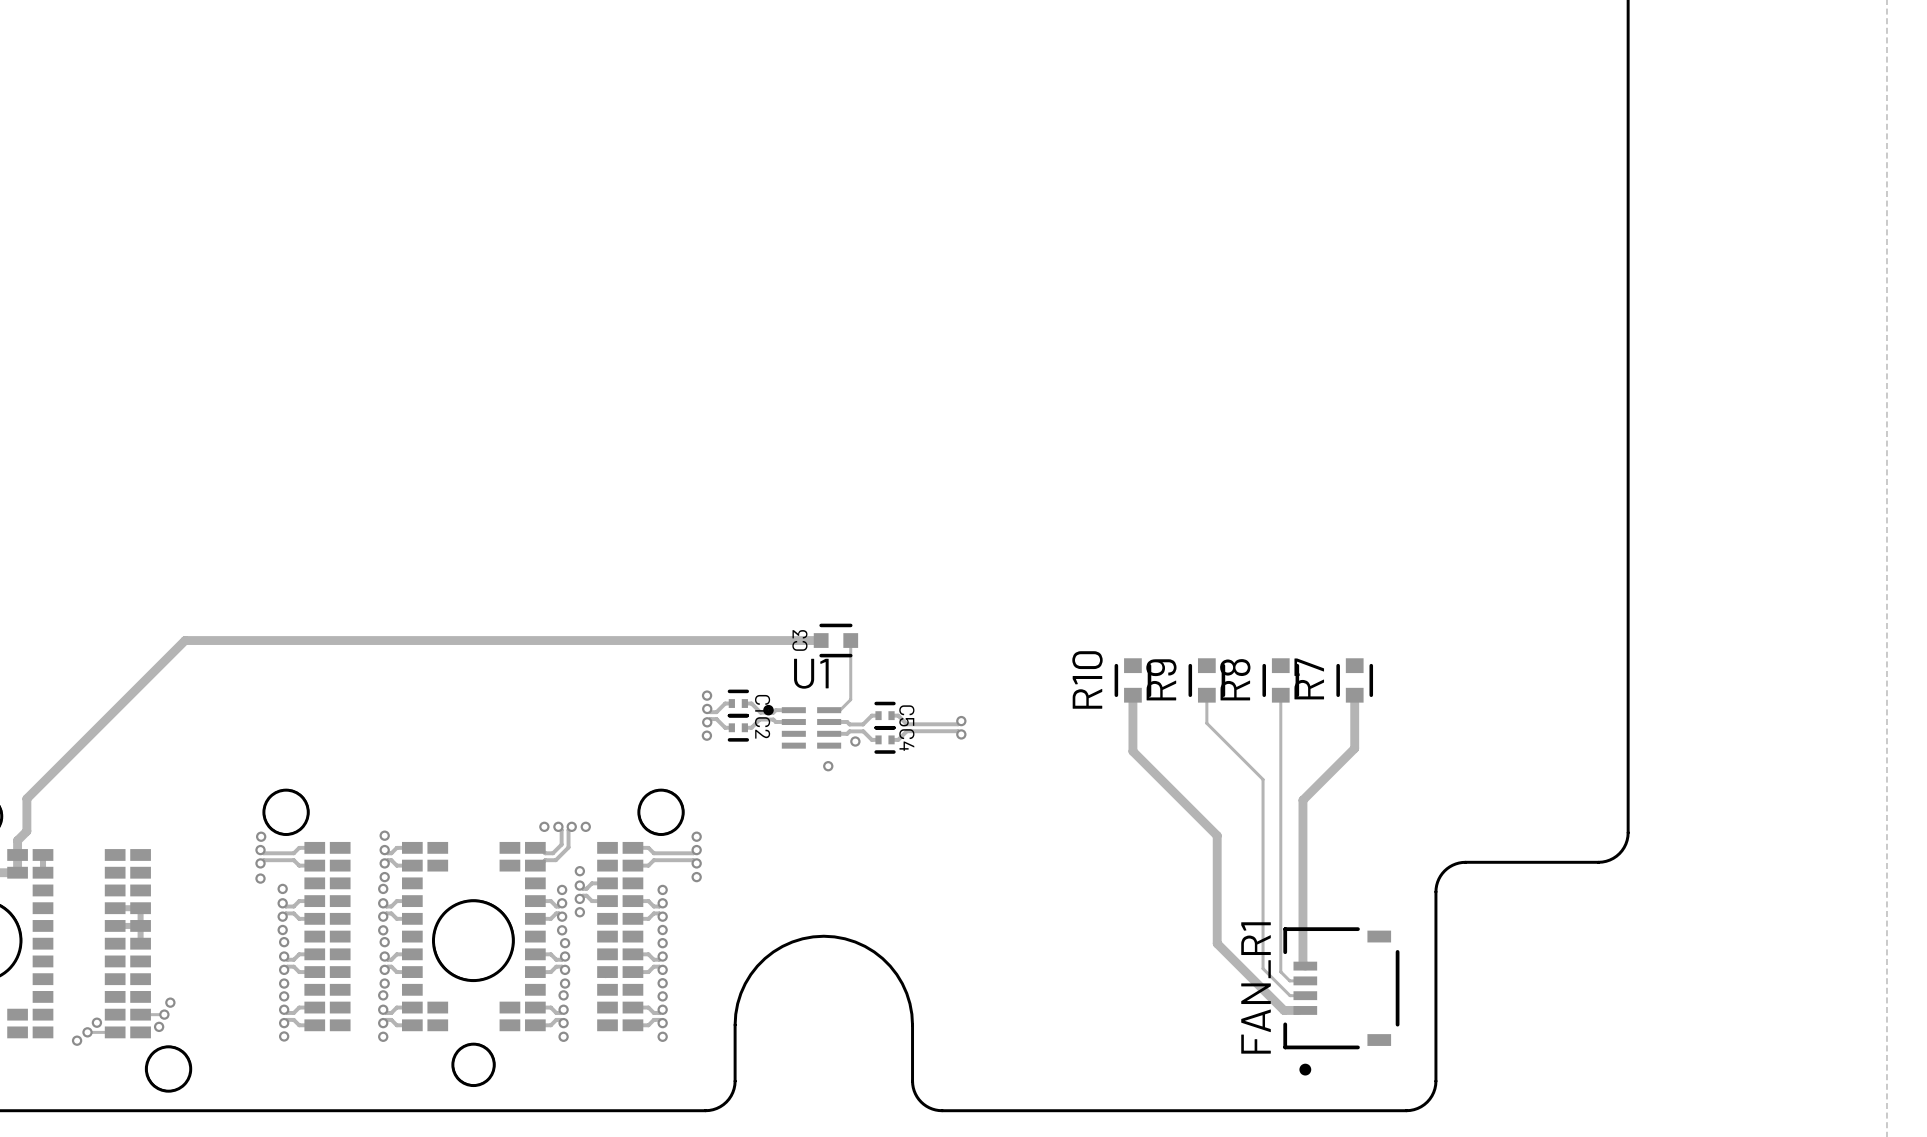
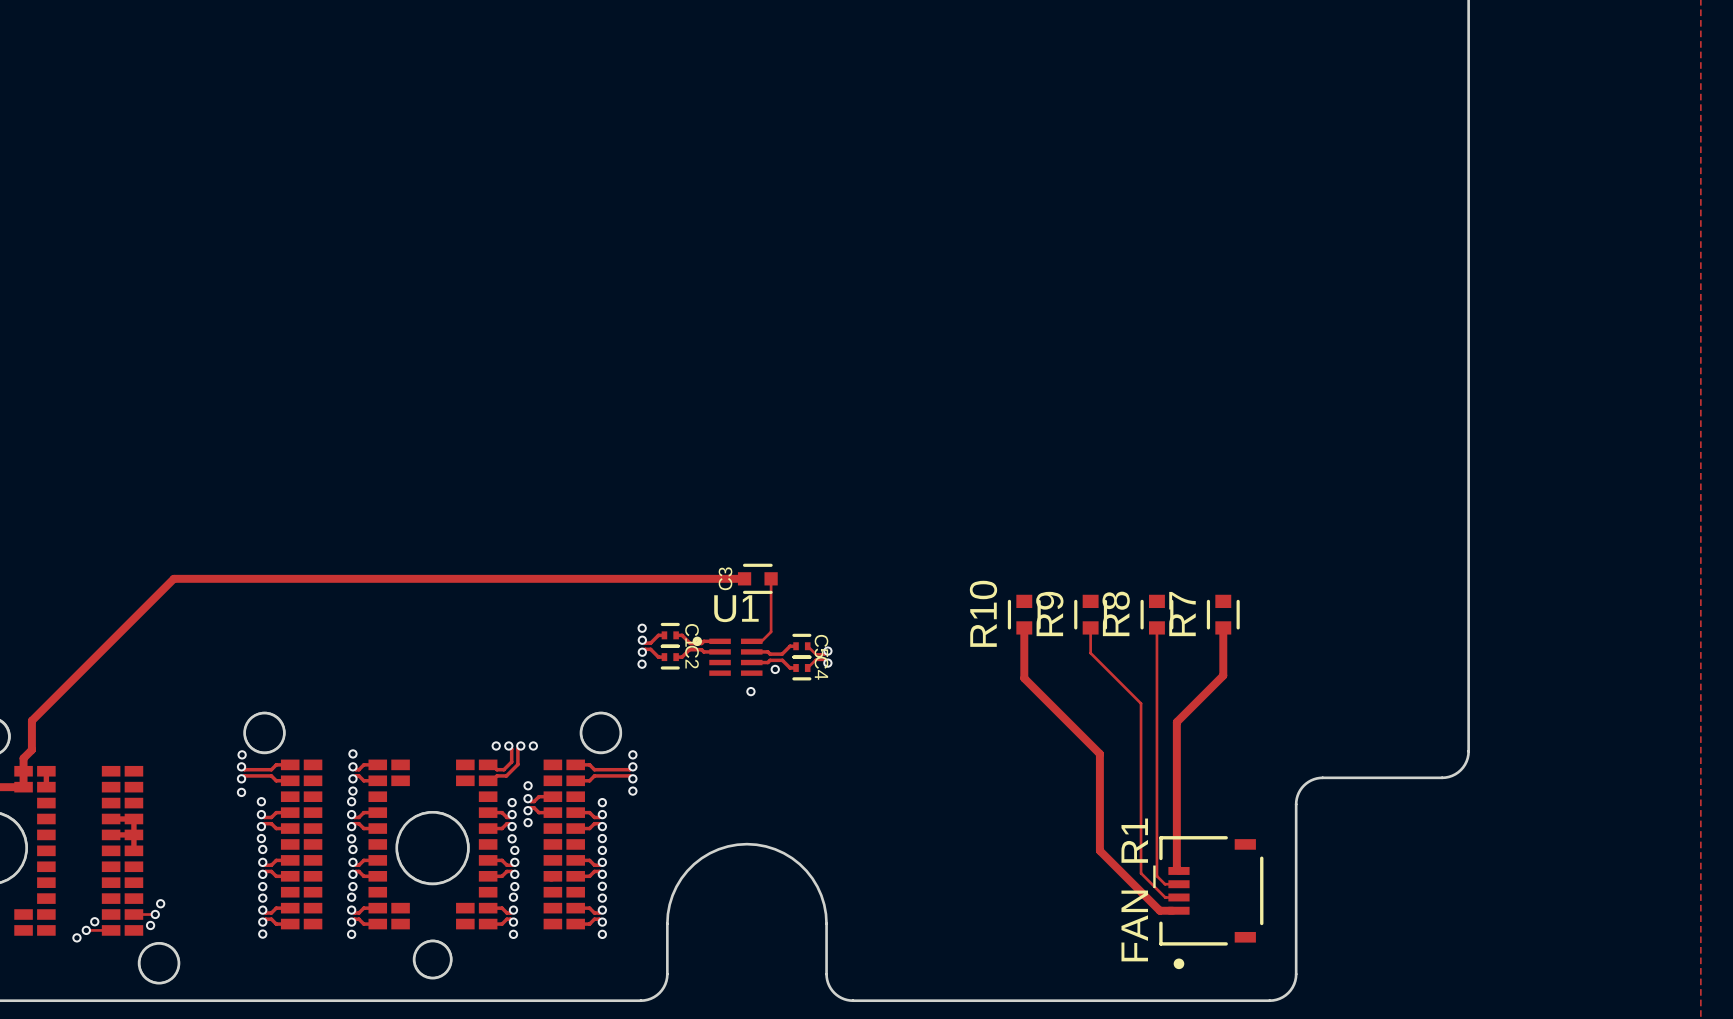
track: (891, 715) (898, 715) (906, 724) (958, 724) (961, 721) -> (807, 646) (815, 654) (824, 654) (827, 651)
via: none -> (827, 651)
via: (961, 721) -> none
via: none -> (827, 663)
track: (961, 734) (958, 731) (906, 731) (898, 739) (891, 739) -> (827, 663) (824, 659) (815, 659) (807, 667)
via: (961, 734) -> none

